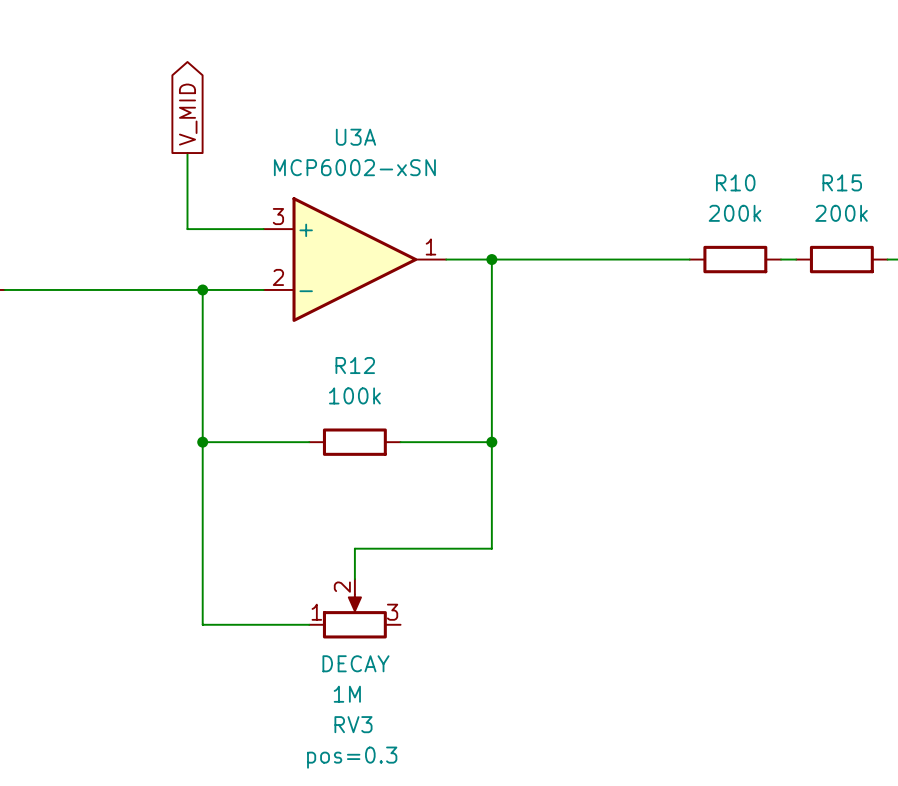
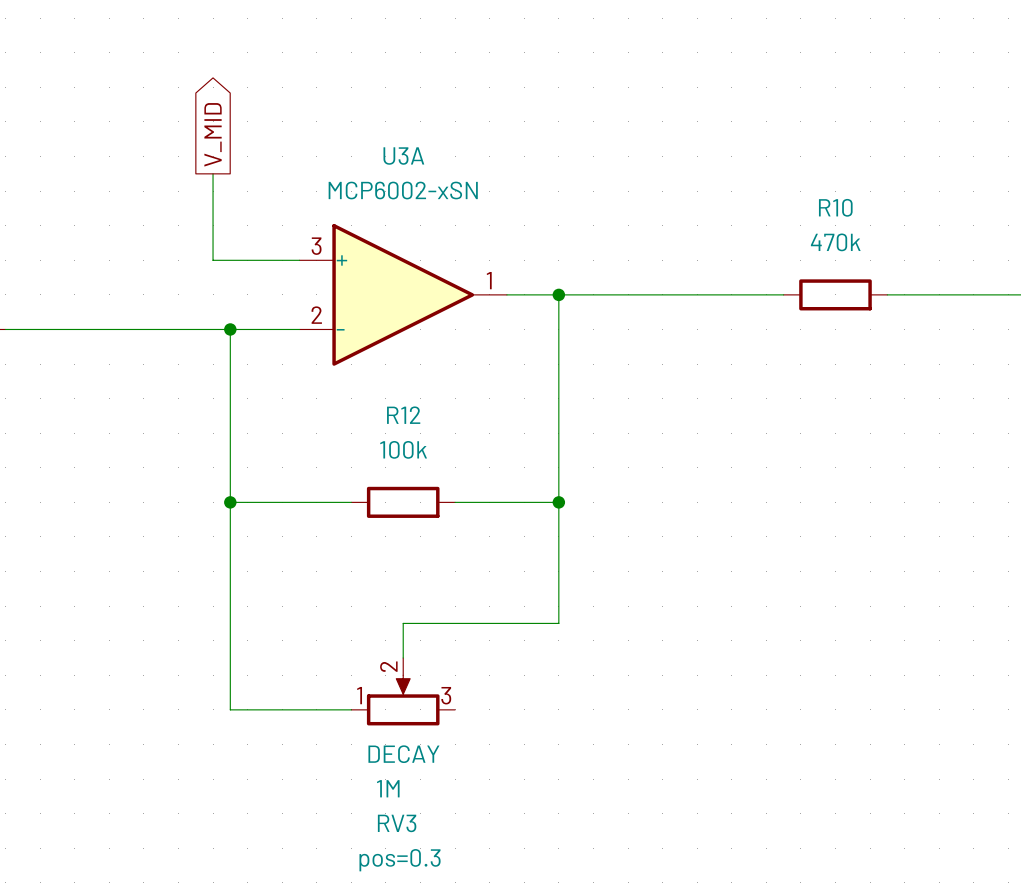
R10 value: 200k (734, 213) -> 470k (835, 242)
wire: none -> (904, 294) (1008, 294)
R15: 200k (841, 259) -> none

